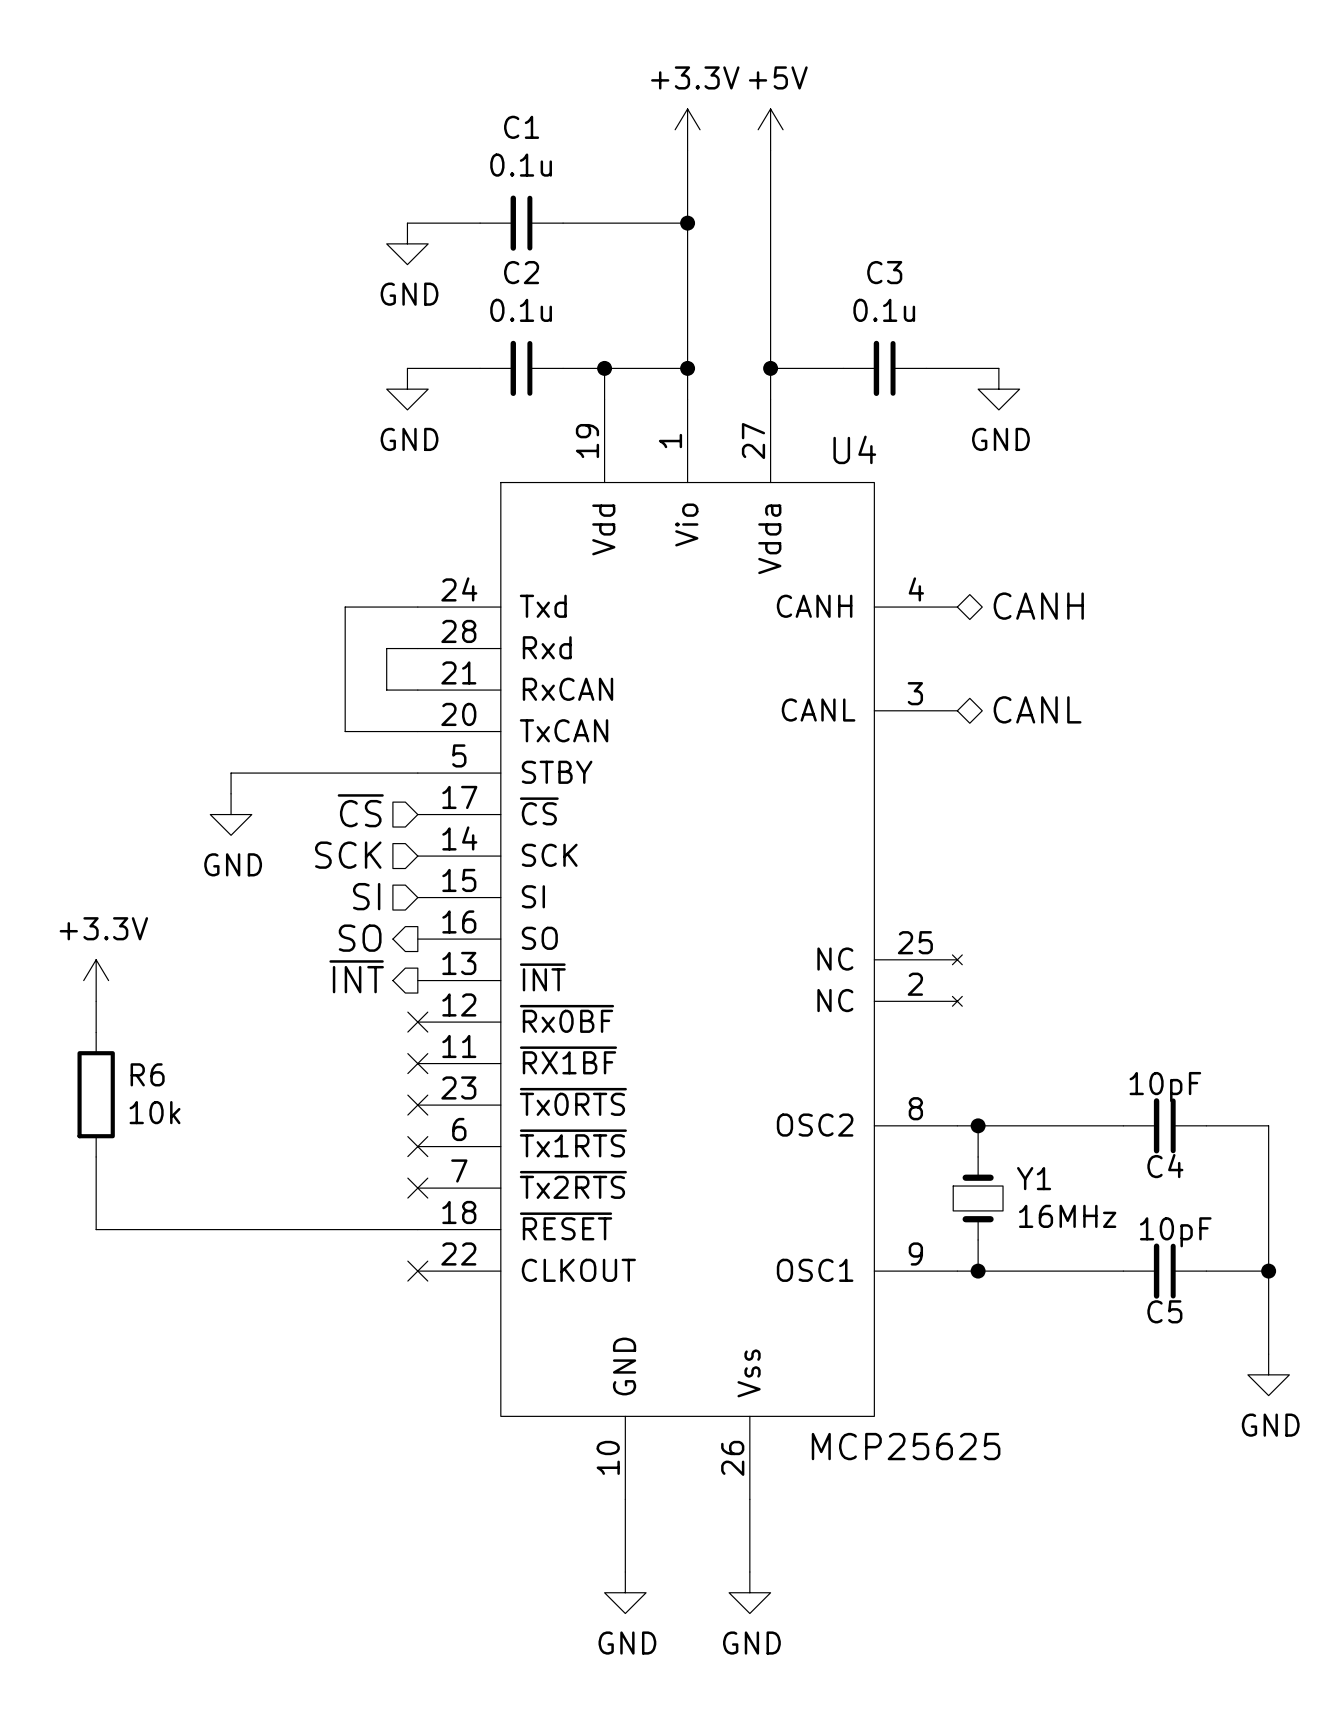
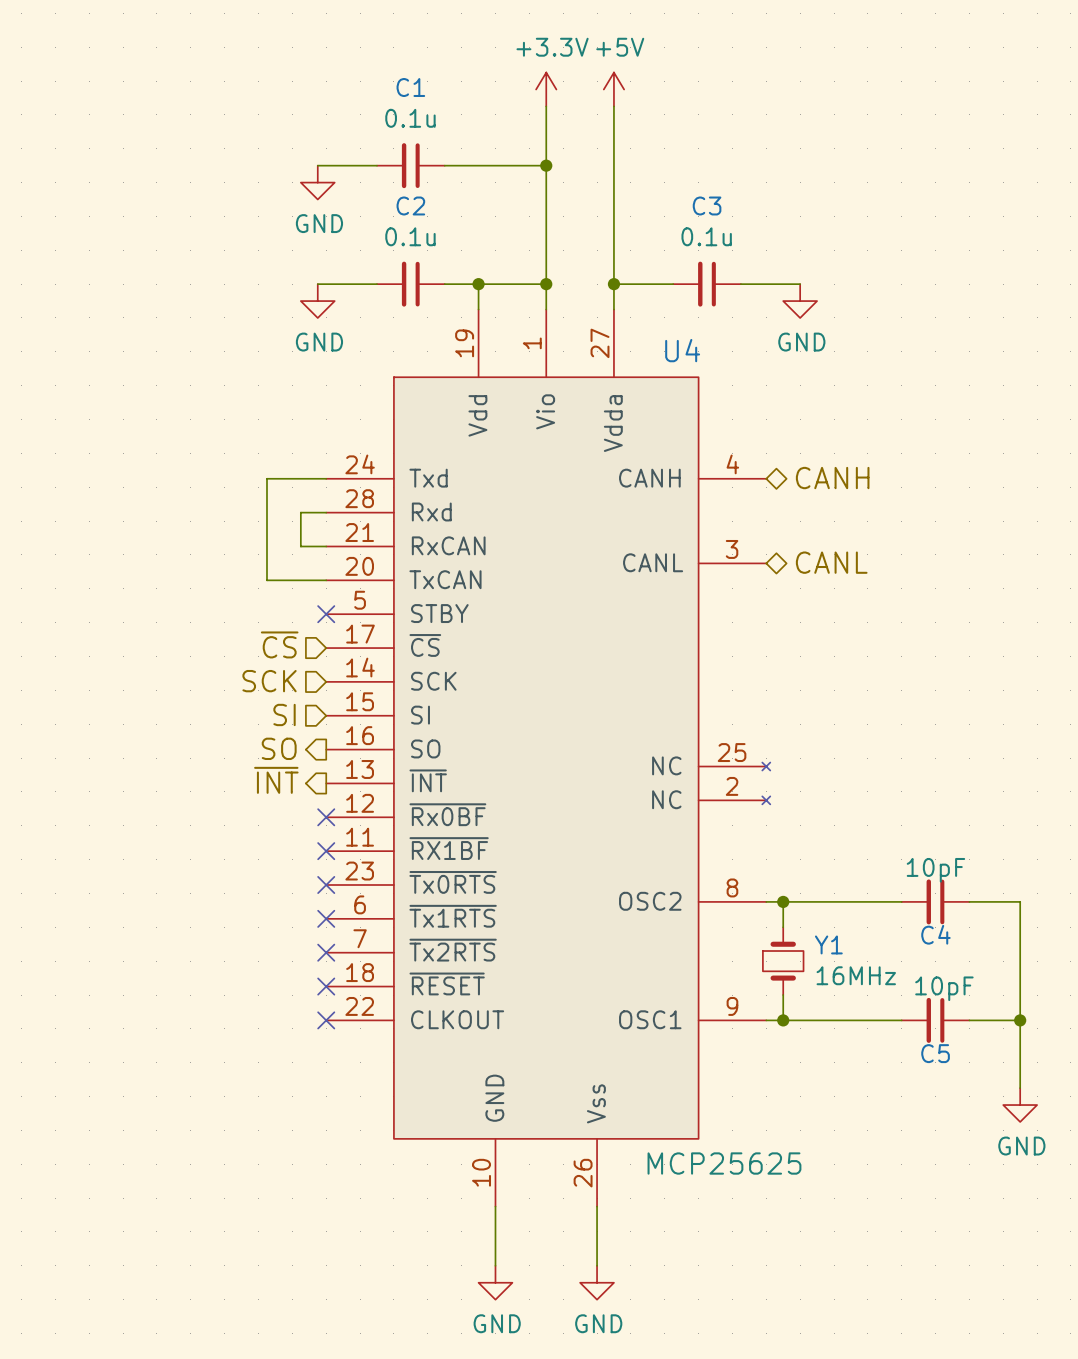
wire: (417, 773) (231, 773) (231, 793) -> none
no-connect mark: none -> (326, 614)
power symbol: GND (231, 814) -> none
power symbol: +3.3V (96, 980) -> none
wire: (96, 1001) (96, 1032) -> none
R6: 10k (96, 1094) -> none
wire: (96, 1156) (96, 1229) (417, 1229) -> none
no-connect mark: none -> (326, 986)

